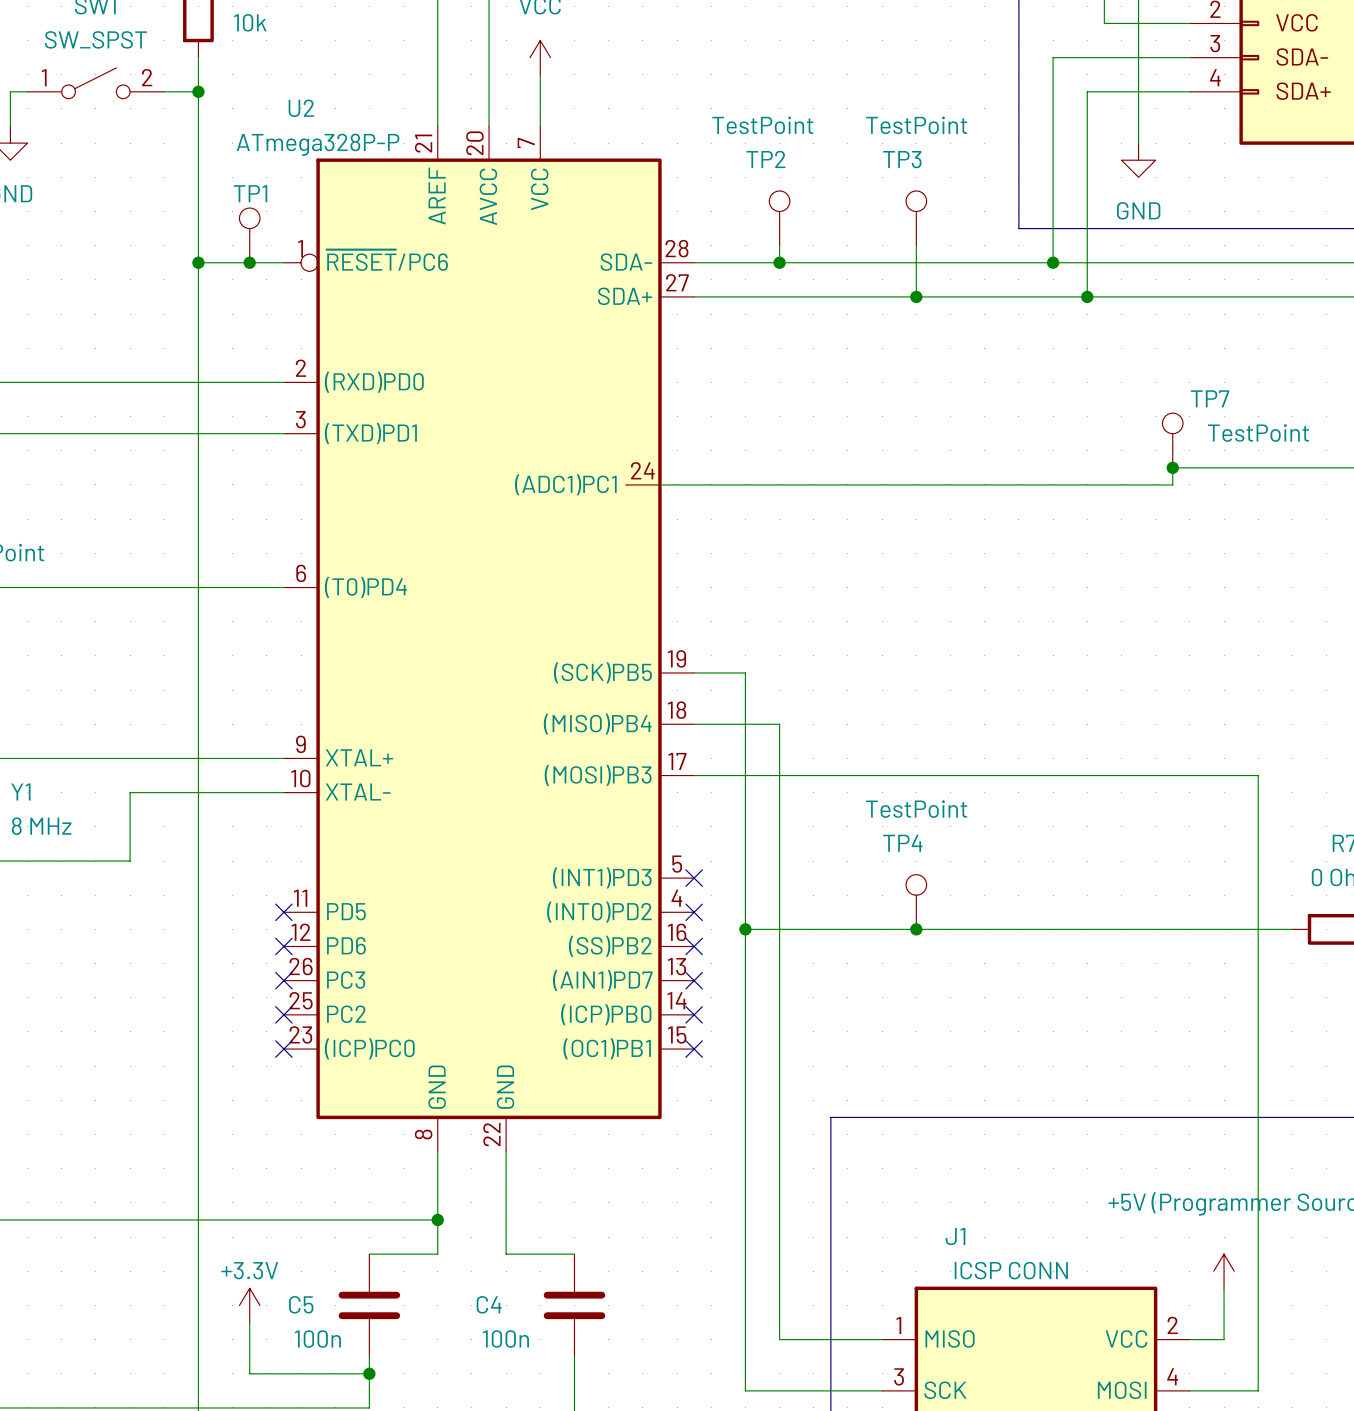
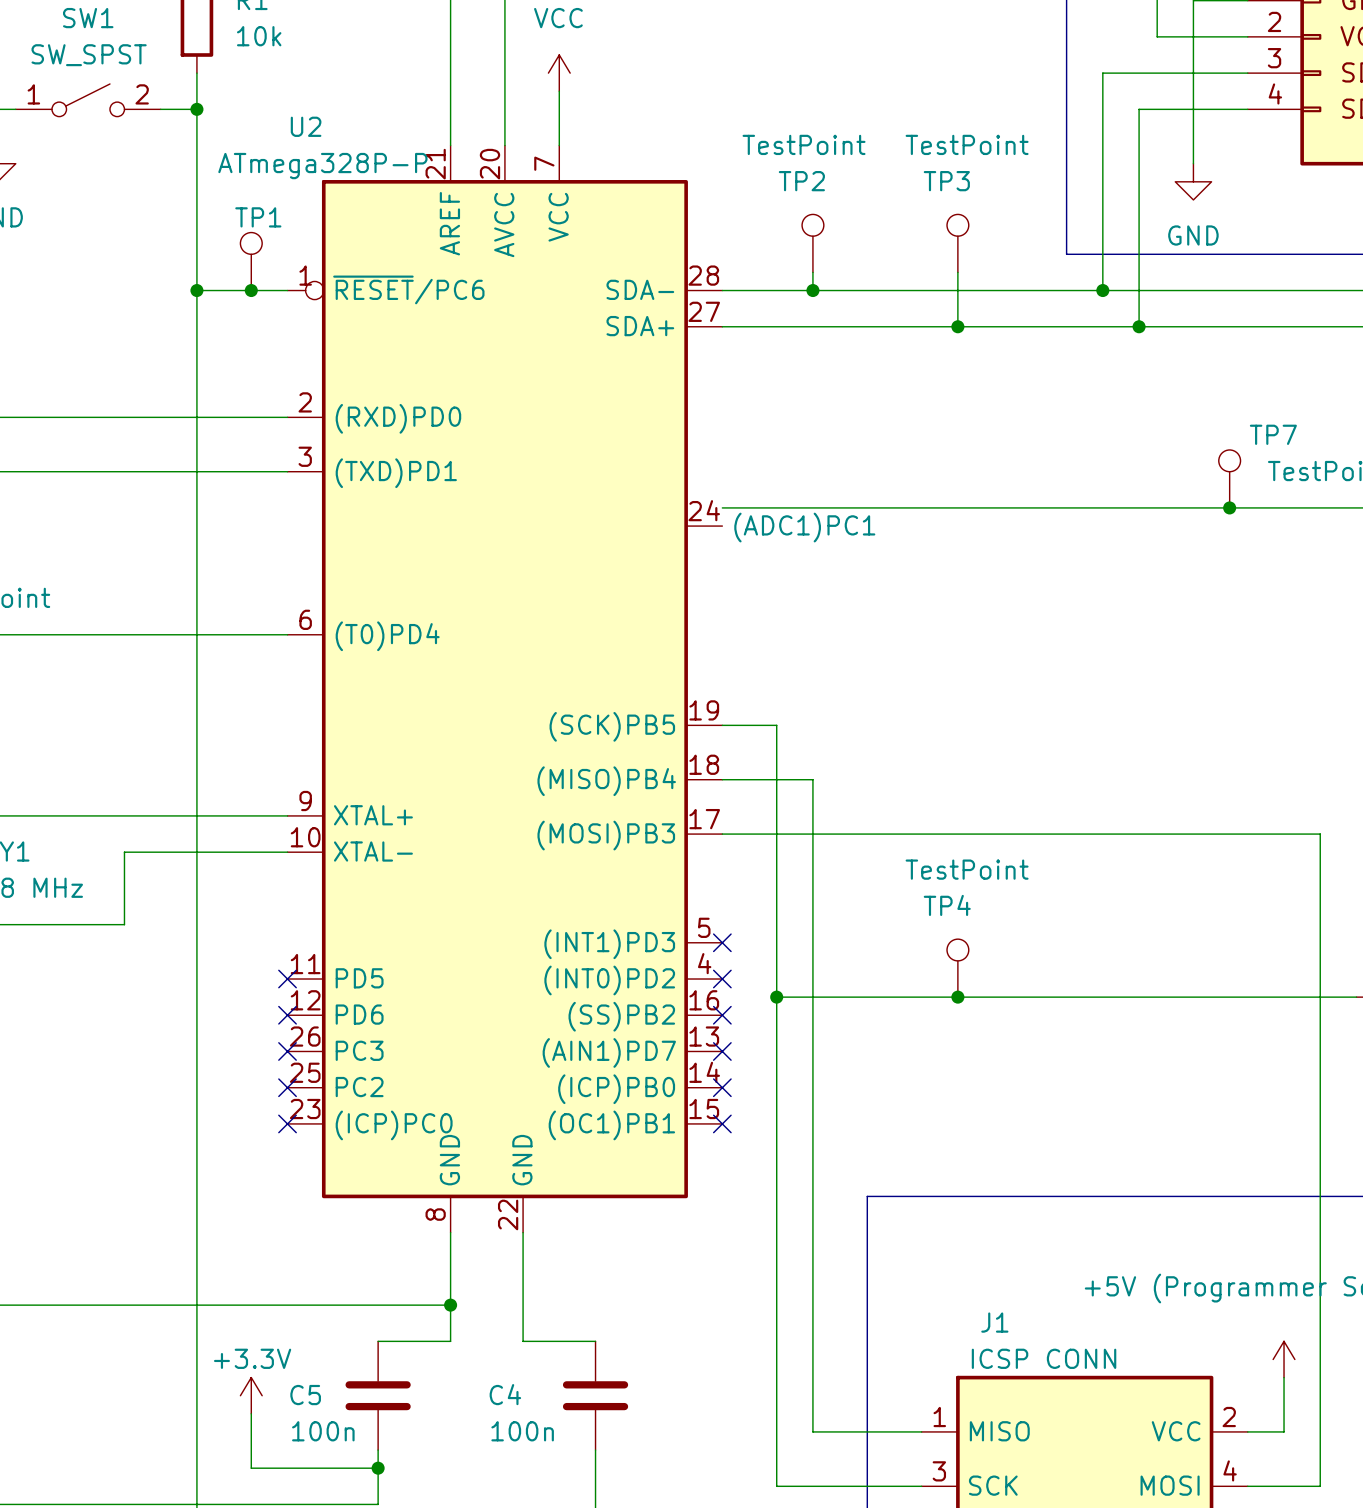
U2 symbol: [283, 126, 695, 1152] -> [287, 145, 723, 1233]
wire: (1172, 467) (1172, 484) (659, 484) -> (1229, 507) (722, 507)

